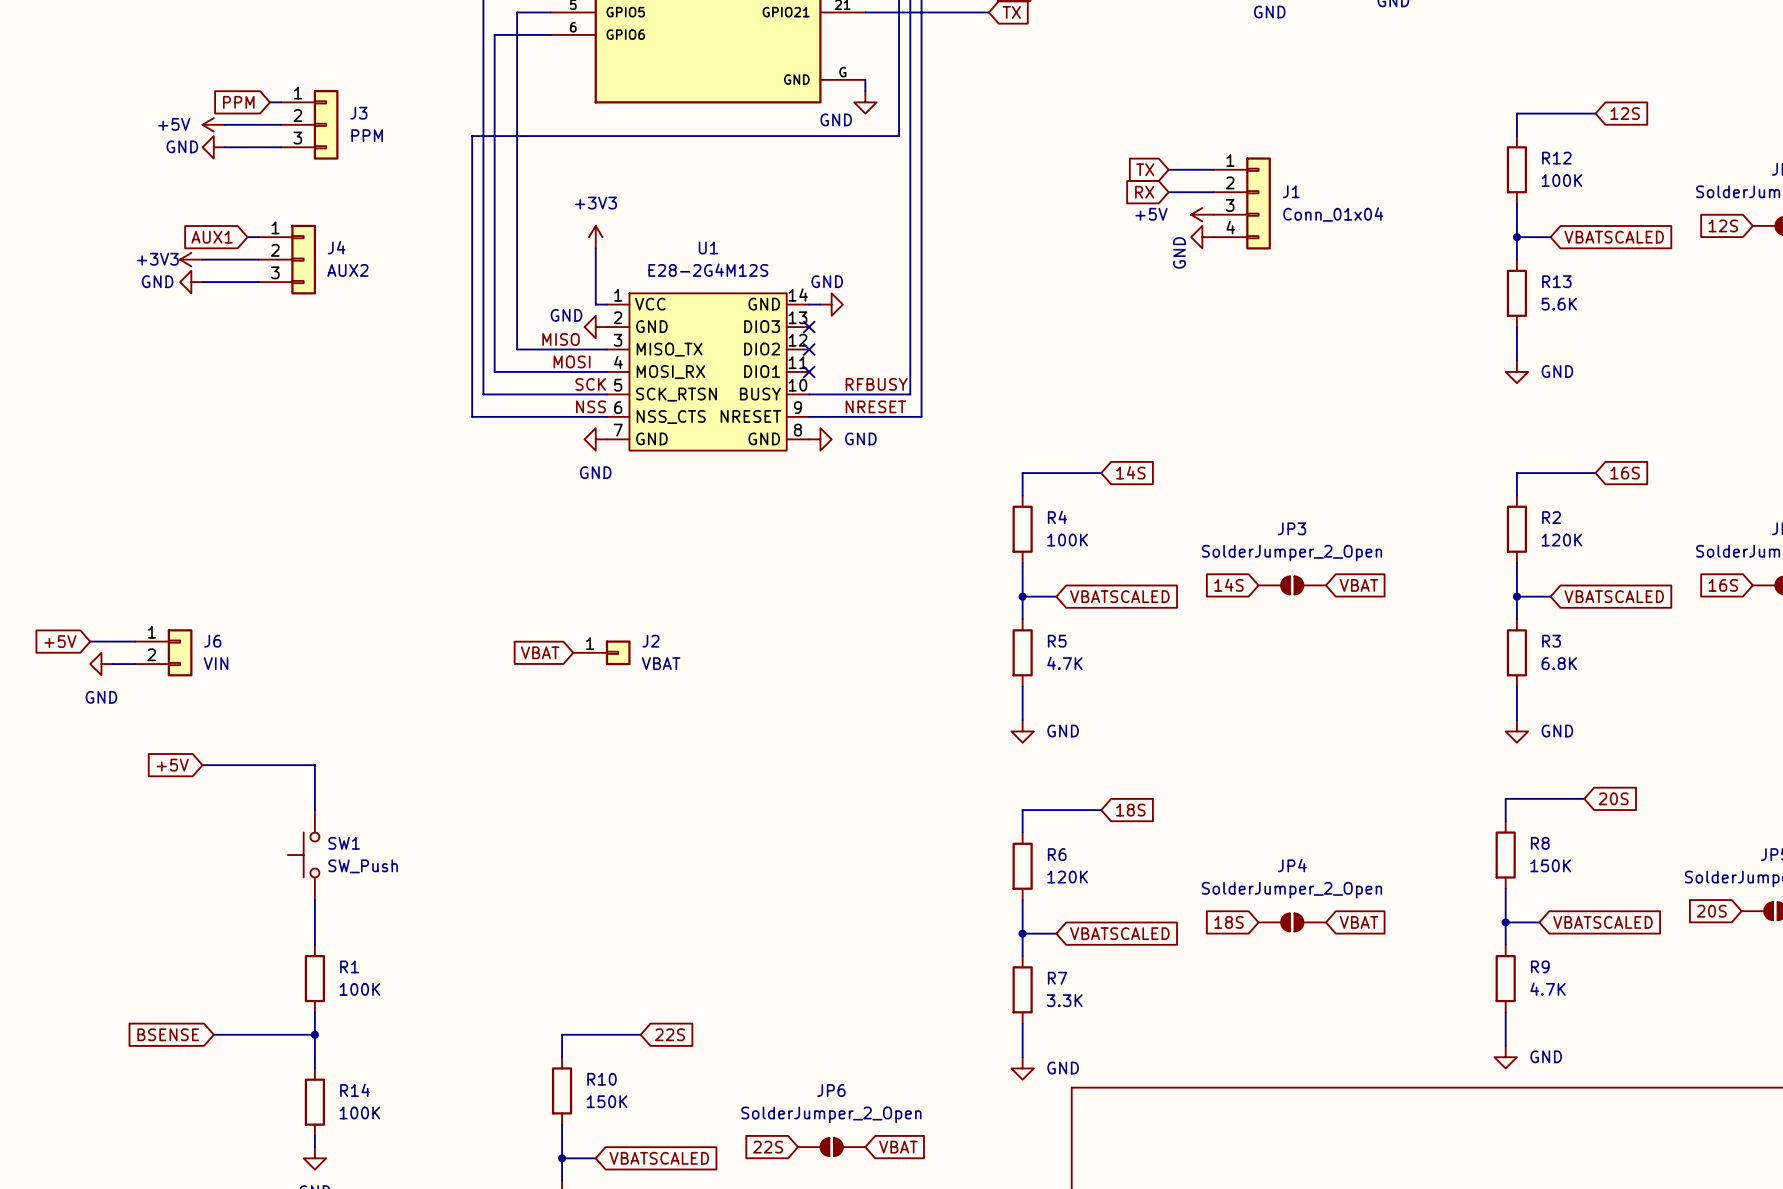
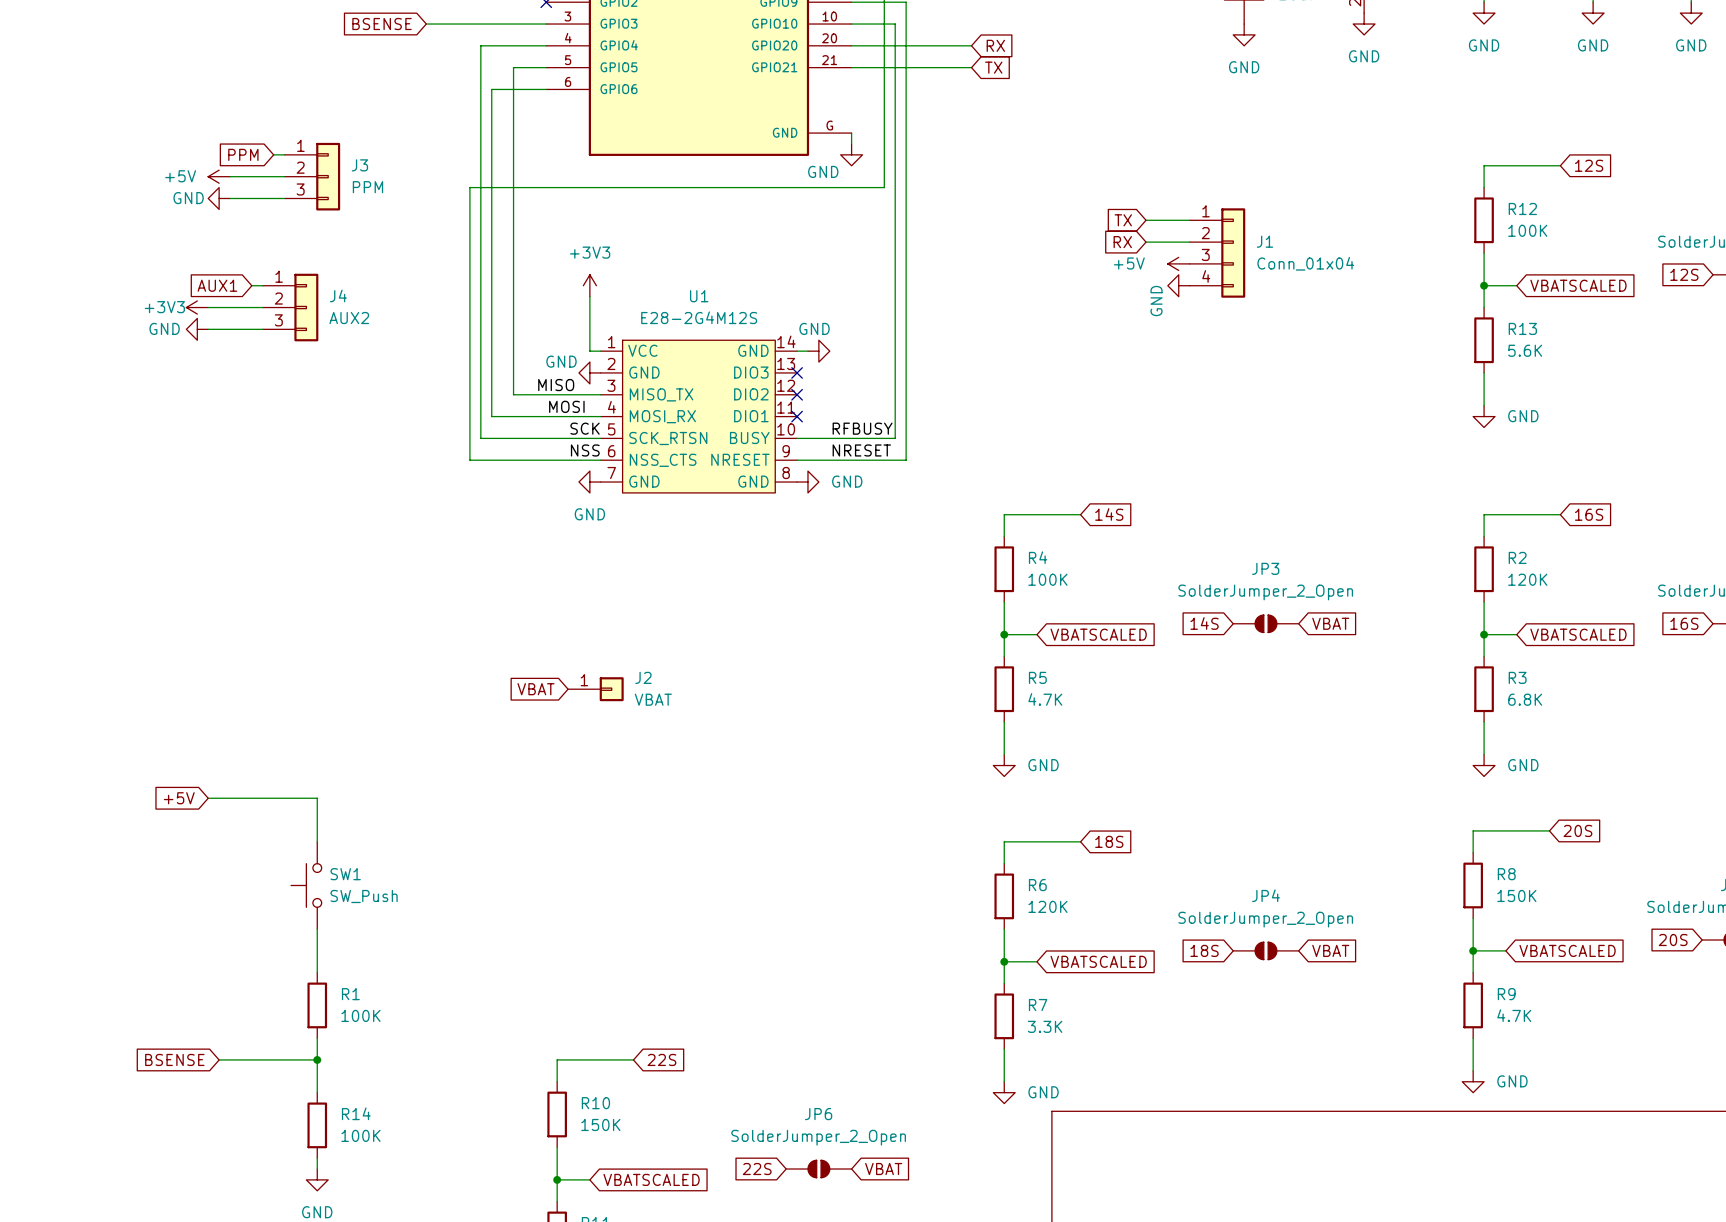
global label: +5V (60, 641) -> none
wire: (90, 641) (135, 641) -> none
J6: VIN (163, 652) -> none
power symbol: GND (101, 664) -> none
wire: (112, 664) (135, 664) -> none

